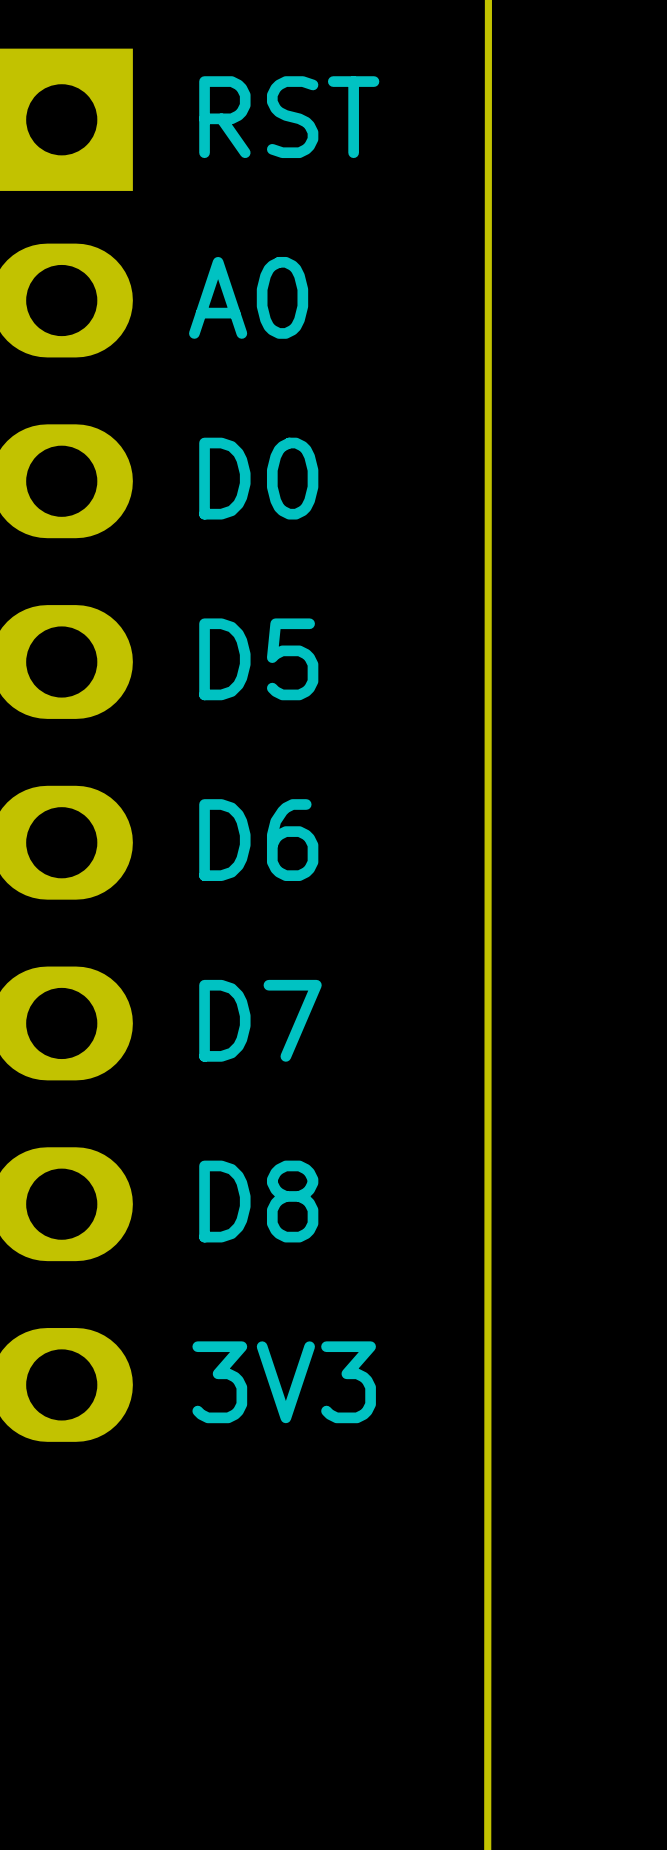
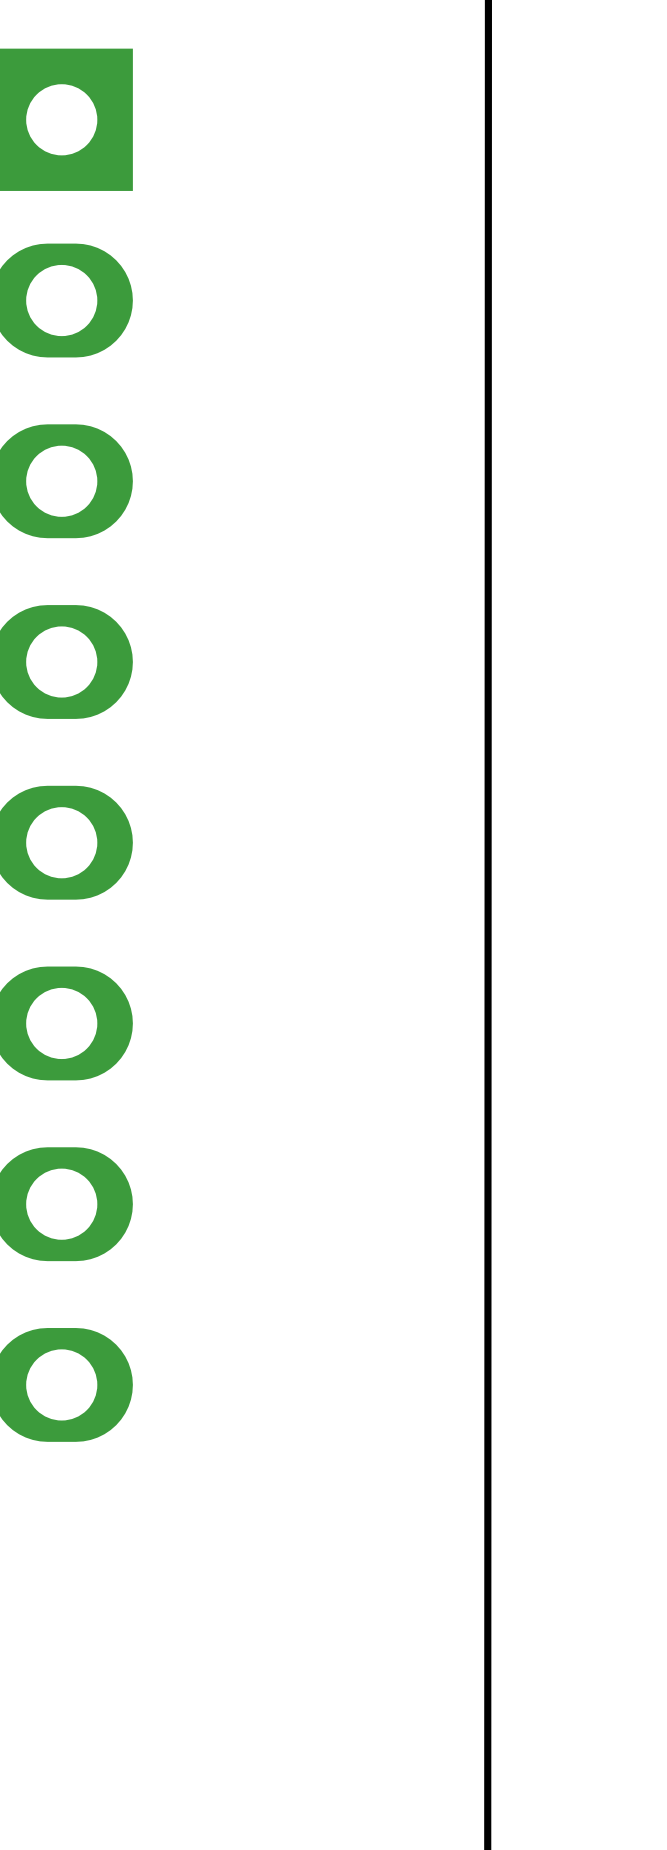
text: RST (289, 117) -> none
text: A0 (248, 297) -> none
text: D0 (258, 478) -> none
text: D5 (258, 659) -> none
text: D6 (258, 840) -> none
text: D7 (260, 1020) -> none
text: D8 (258, 1201) -> none
text: 3V3 (284, 1382) -> none

